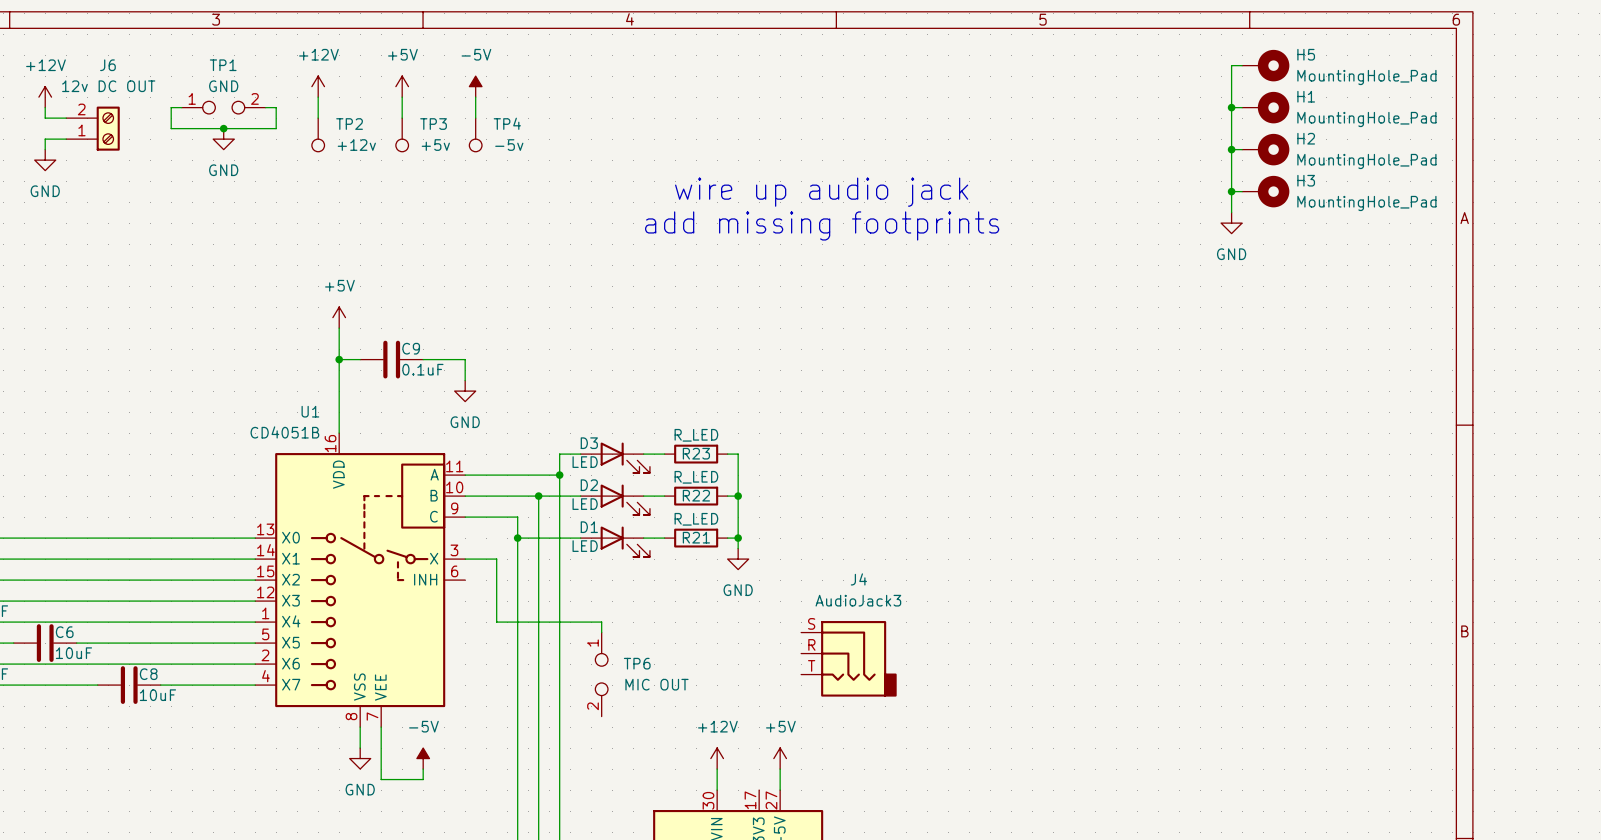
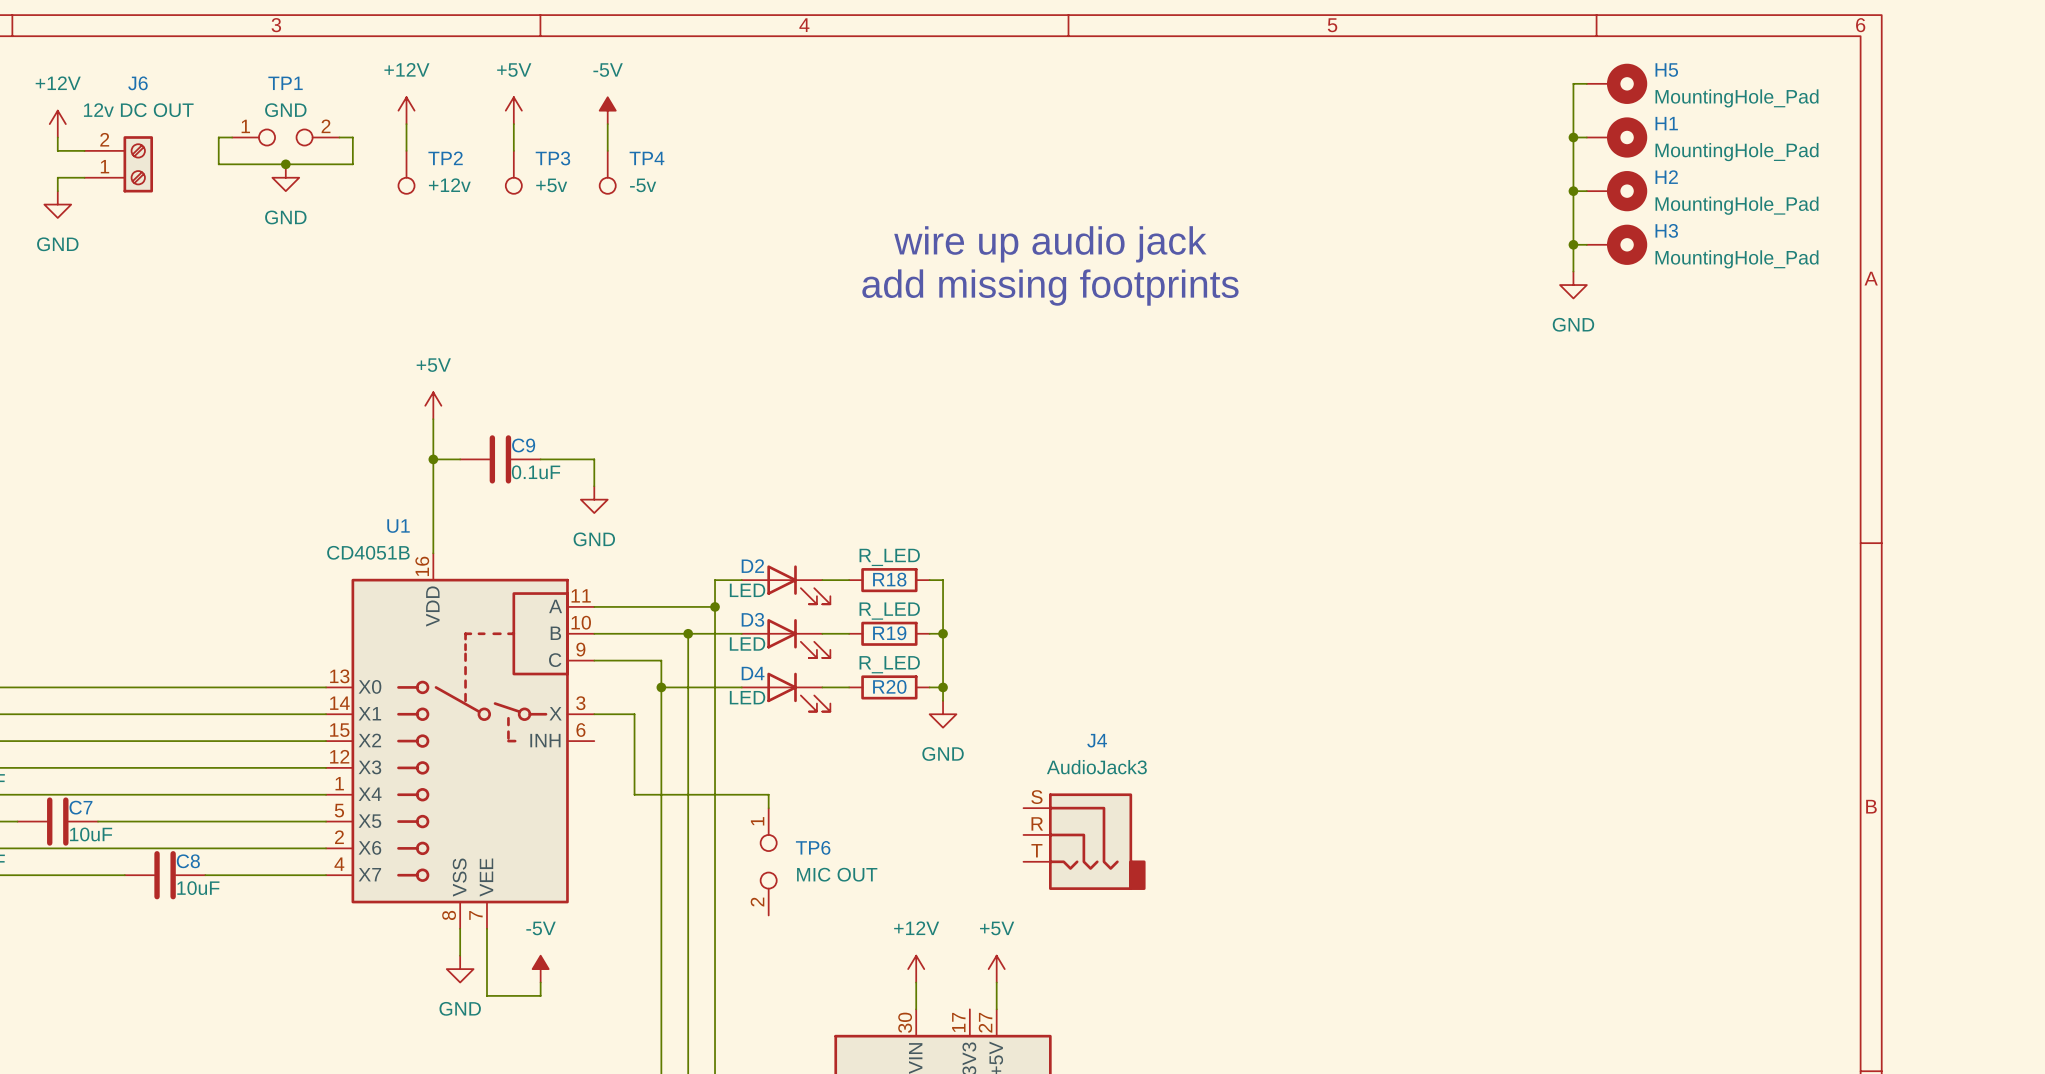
D3 name: D3 (589, 443) -> D2 (752, 566)
R23 name: R23 (696, 453) -> R18 (889, 579)
D2 name: D2 (589, 485) -> D3 (752, 619)
R22 name: R22 (696, 495) -> R19 (889, 633)
D1 name: D1 (589, 527) -> D4 (753, 673)
R21 name: R21 (696, 537) -> R20 (889, 686)
C6 name: C6 (64, 632) -> C7 (80, 807)

